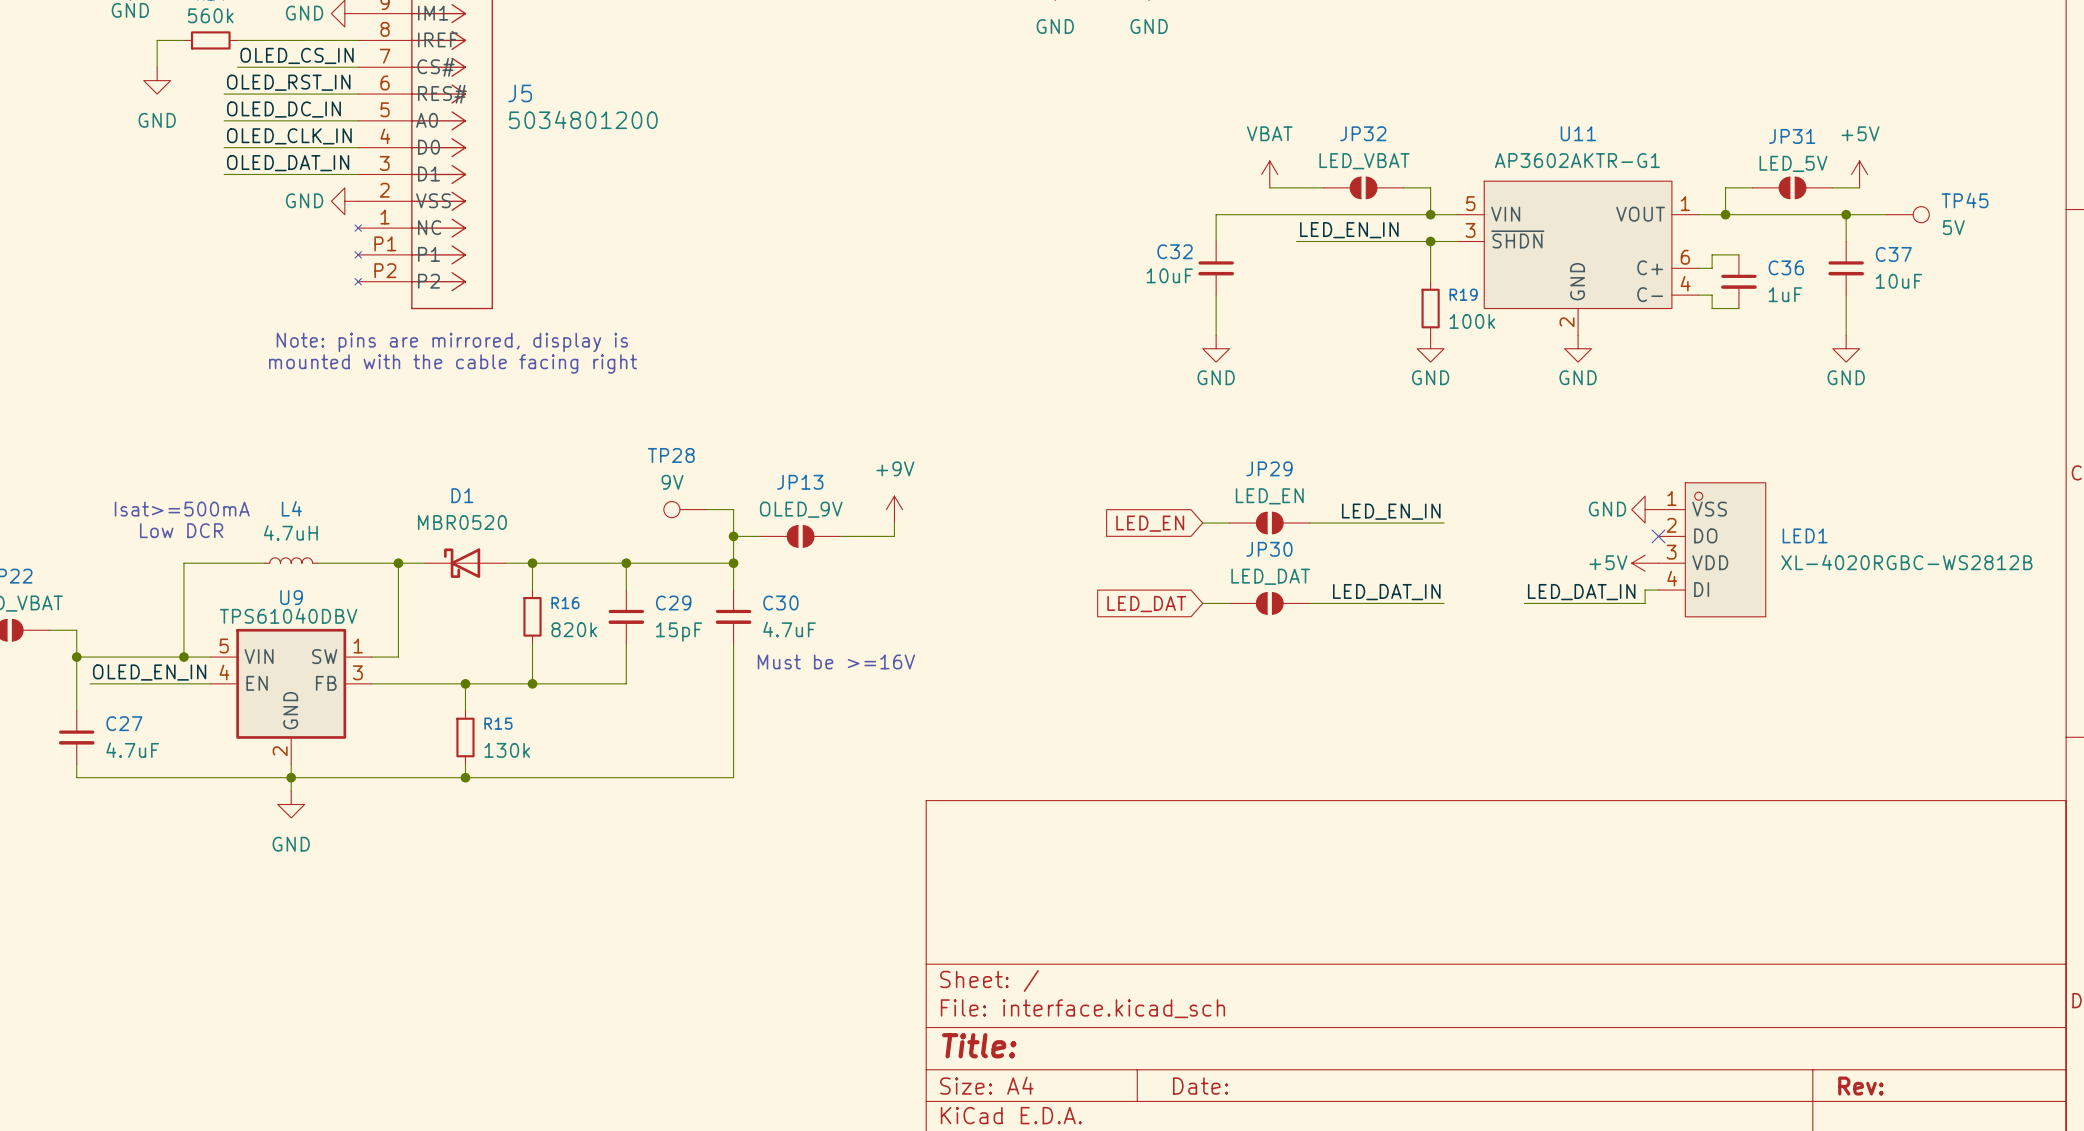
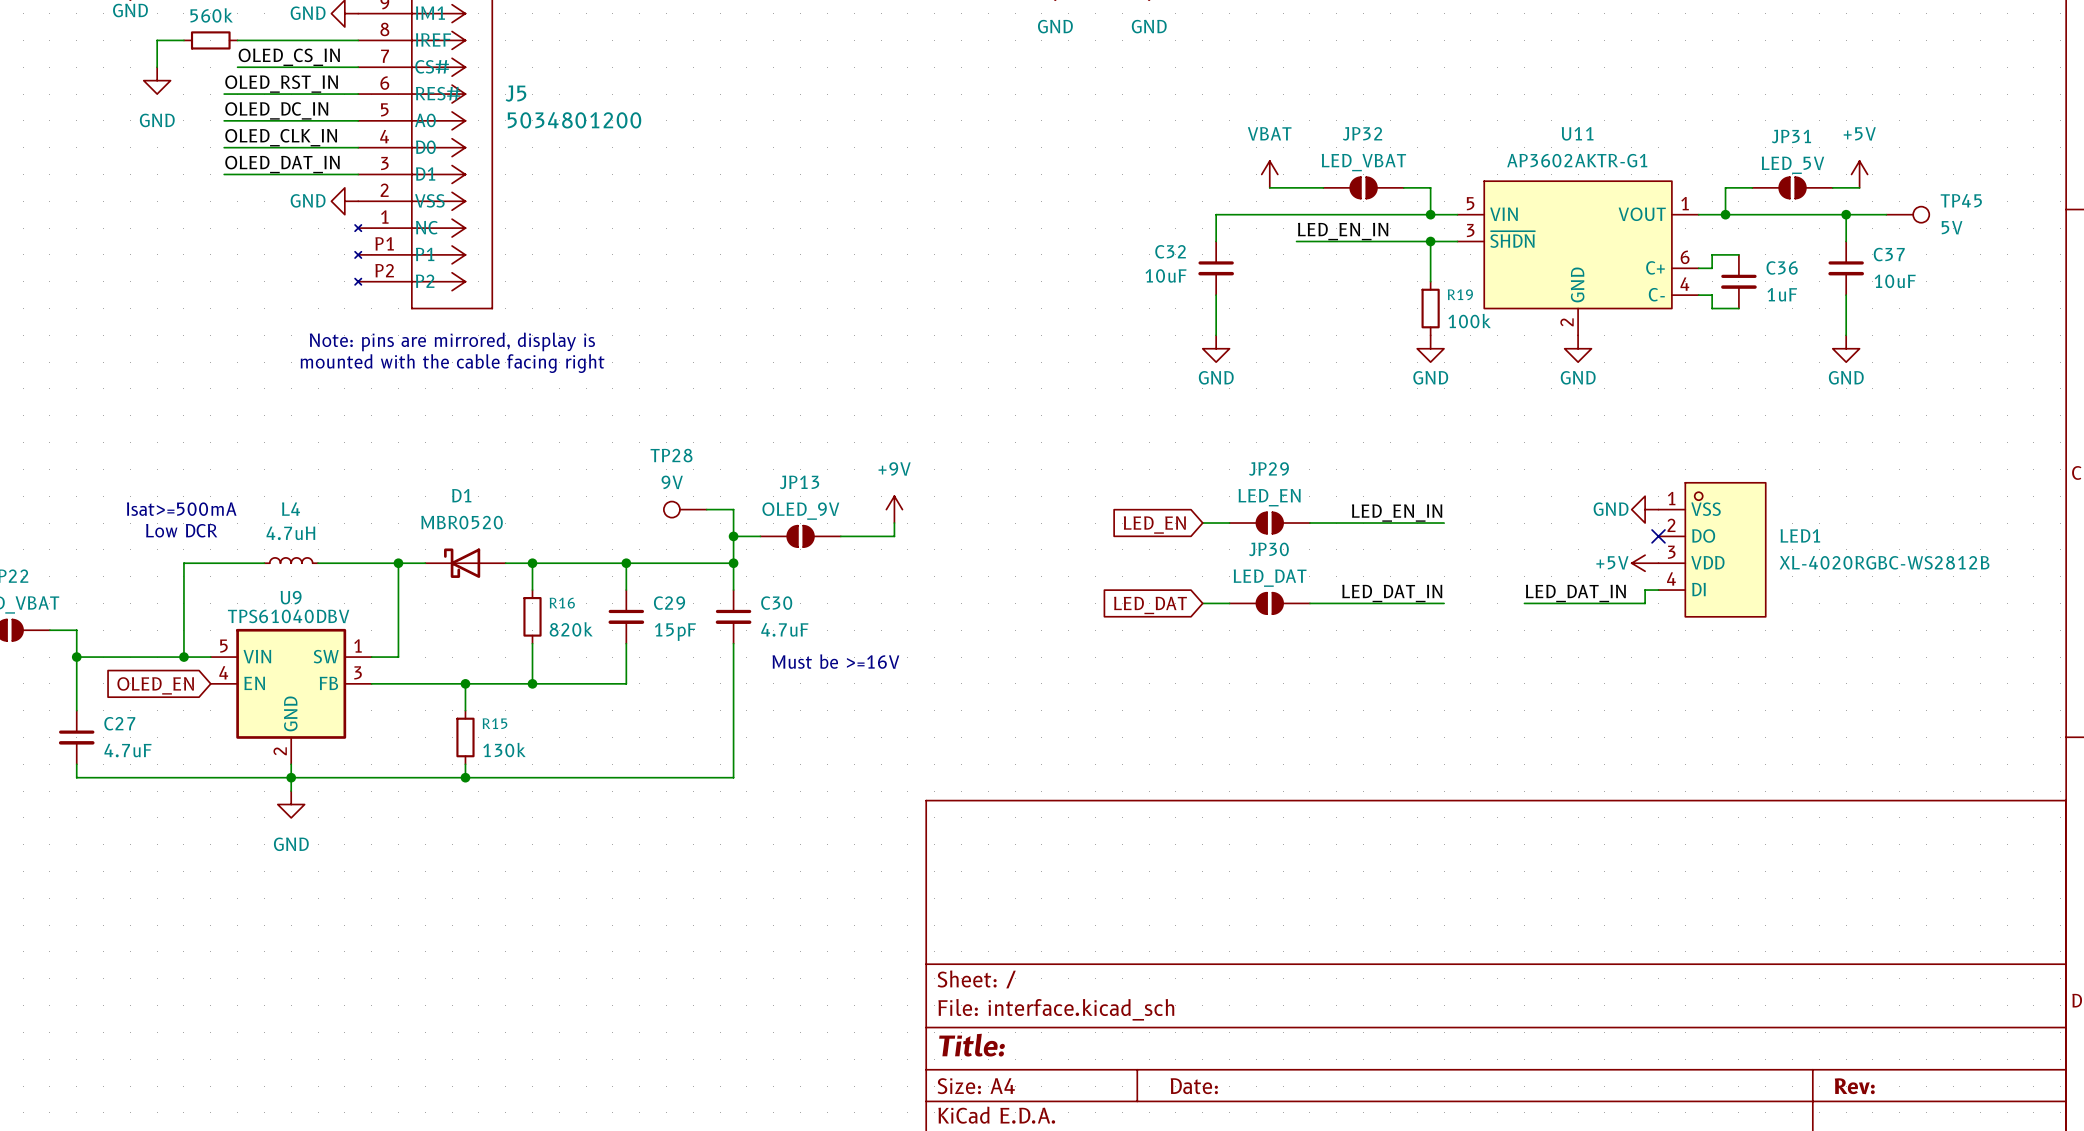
label: OLED_EN_IN (149, 672) -> none
wire: (90, 683) (210, 683) -> none
global label: none -> OLED_EN (155, 685)

